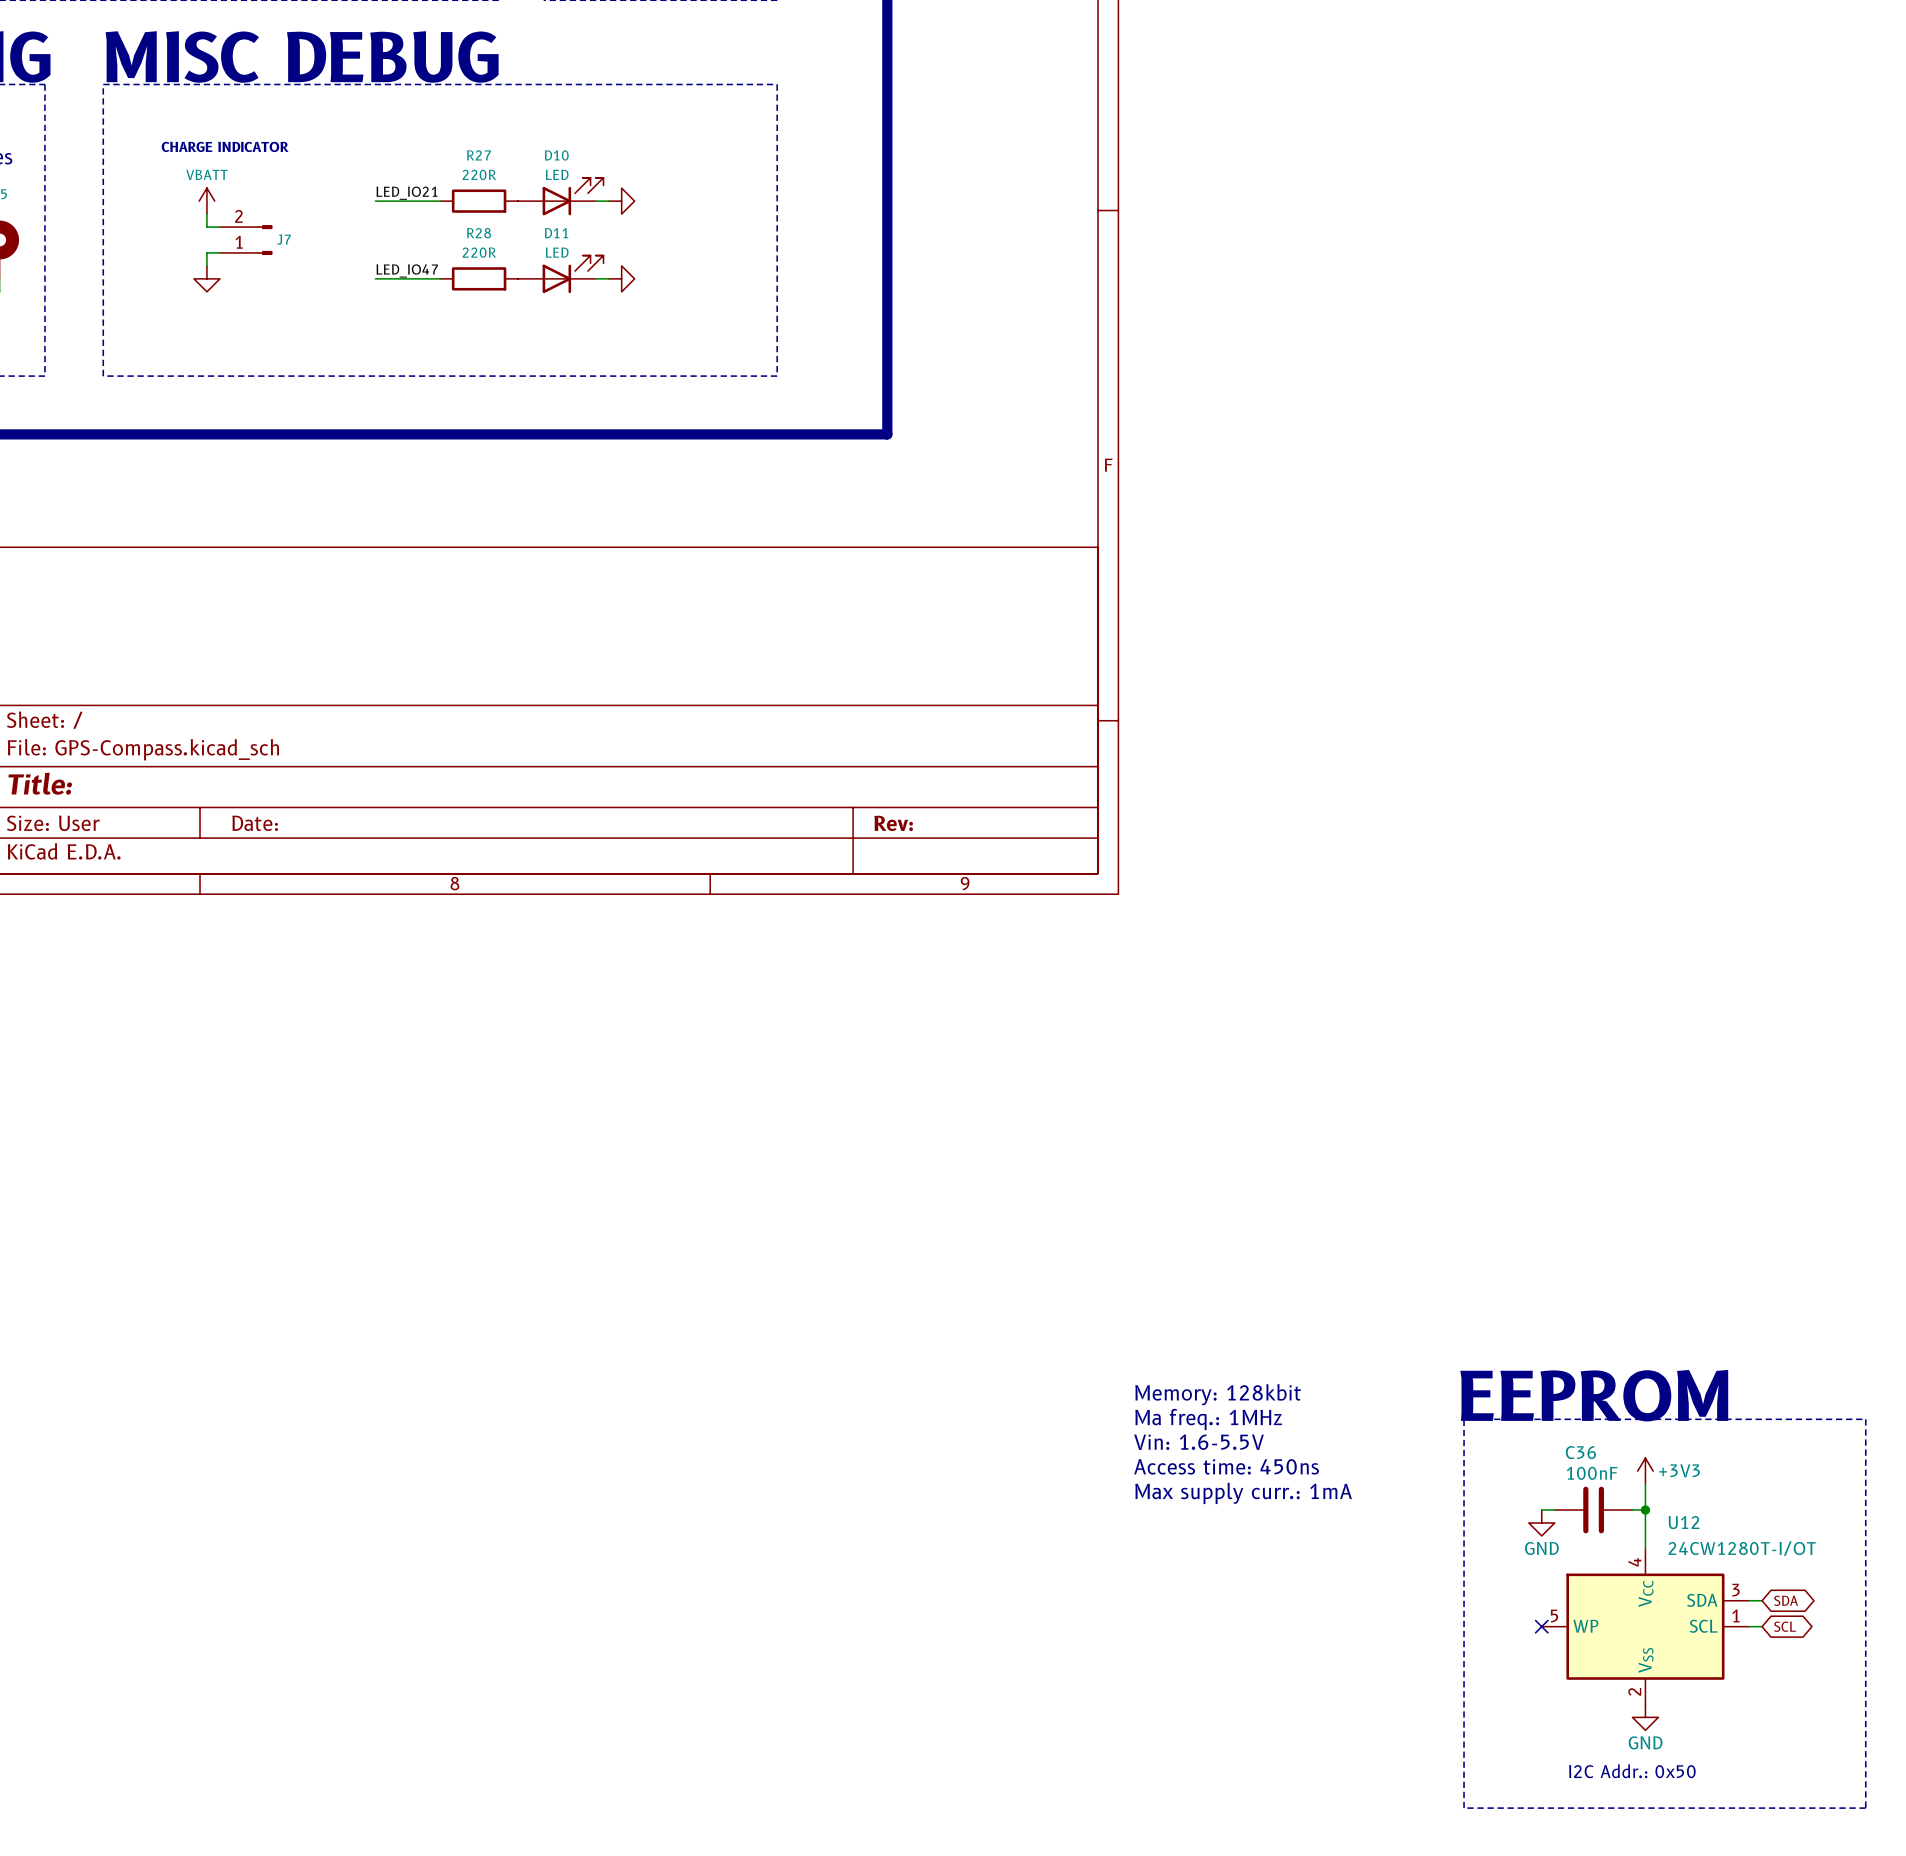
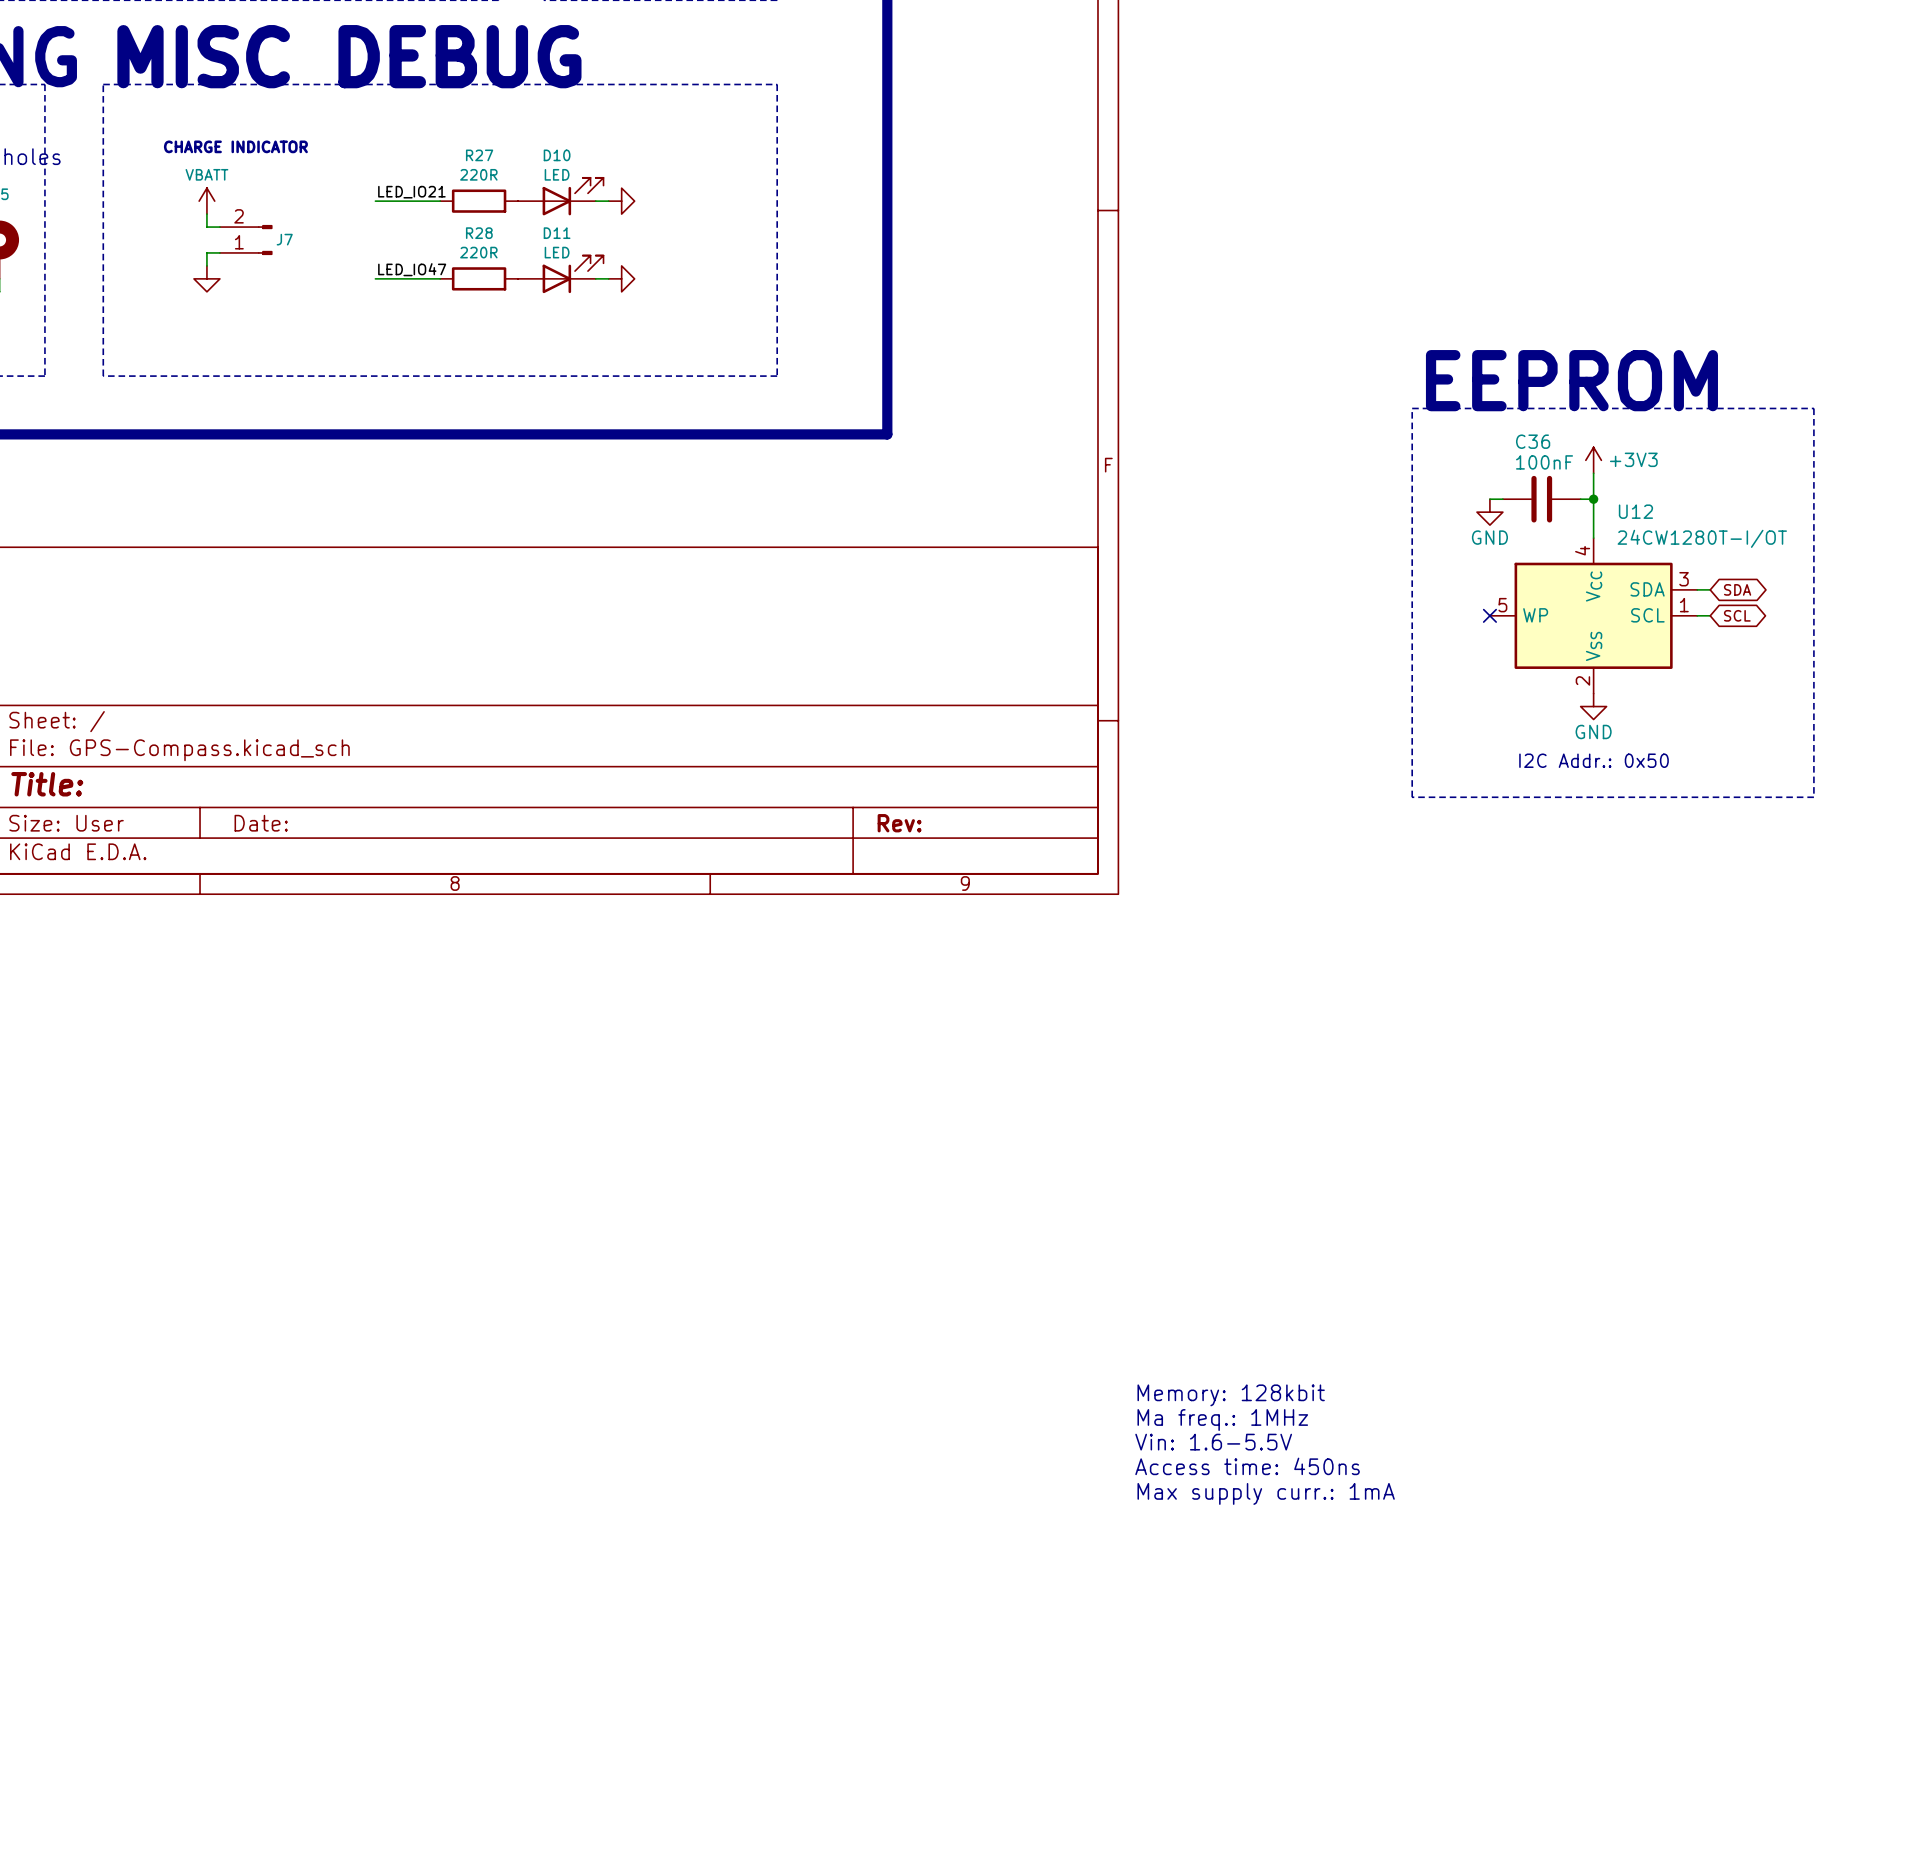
text: none -> EEPROM (1571, 380)
line: none -> (1412, 408) (1813, 408) (1813, 797) (1412, 797) (1412, 408)
power symbol: none -> +3V3 (1593, 460)
wire: none -> (1593, 473) (1593, 538)
wire: none -> (1489, 499) (1502, 499)
wire: none -> (1580, 499) (1593, 499)
junction: none -> (1593, 499)
power symbol: none -> GND (1489, 512)
wire: none -> (1697, 589) (1710, 589)
global label: none -> SDA (1737, 589)
no-connect mark: none -> (1489, 615)
wire: none -> (1697, 615) (1710, 615)
global label: none -> SCL (1737, 615)
power symbol: none -> GND (1593, 706)
text: none -> I2C Addr.: 0x50 (1594, 760)
text: EEPROM (1594, 1395) -> none
line: (1464, 1419) (1865, 1419) (1865, 1808) (1464, 1808) (1464, 1419) -> none
power symbol: +3V3 (1645, 1471) -> none
wire: (1645, 1484) (1645, 1548) -> none
wire: (1541, 1510) (1554, 1510) -> none
C36 position: (1593, 1510) -> (1541, 499)
wire: (1632, 1510) (1645, 1510) -> none
junction: (1645, 1510) -> none
power symbol: GND (1541, 1522) -> none
wire: (1749, 1600) (1762, 1600) -> none
global label: SDA (1786, 1600) -> none
no-connect mark: (1541, 1626) -> none
U12 position: (1645, 1626) -> (1593, 615)
wire: (1749, 1626) (1762, 1626) -> none
global label: SCL (1785, 1626) -> none
power symbol: GND (1645, 1717) -> none
text: I2C Addr.: 0x50 (1632, 1771) -> none

